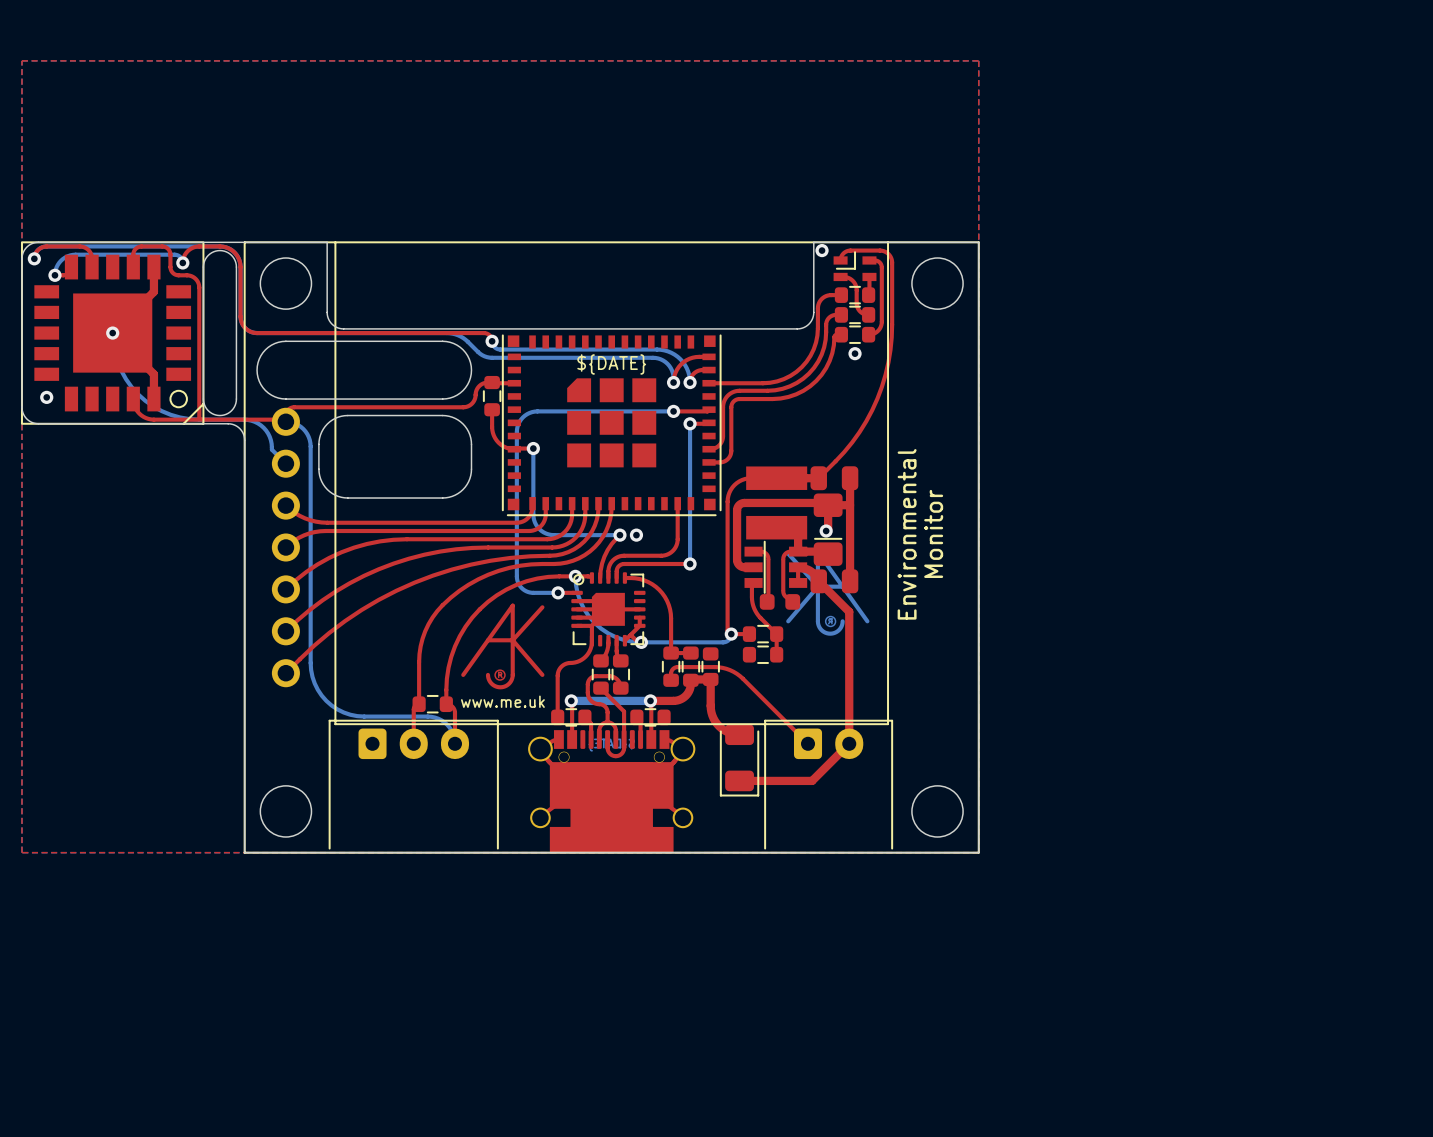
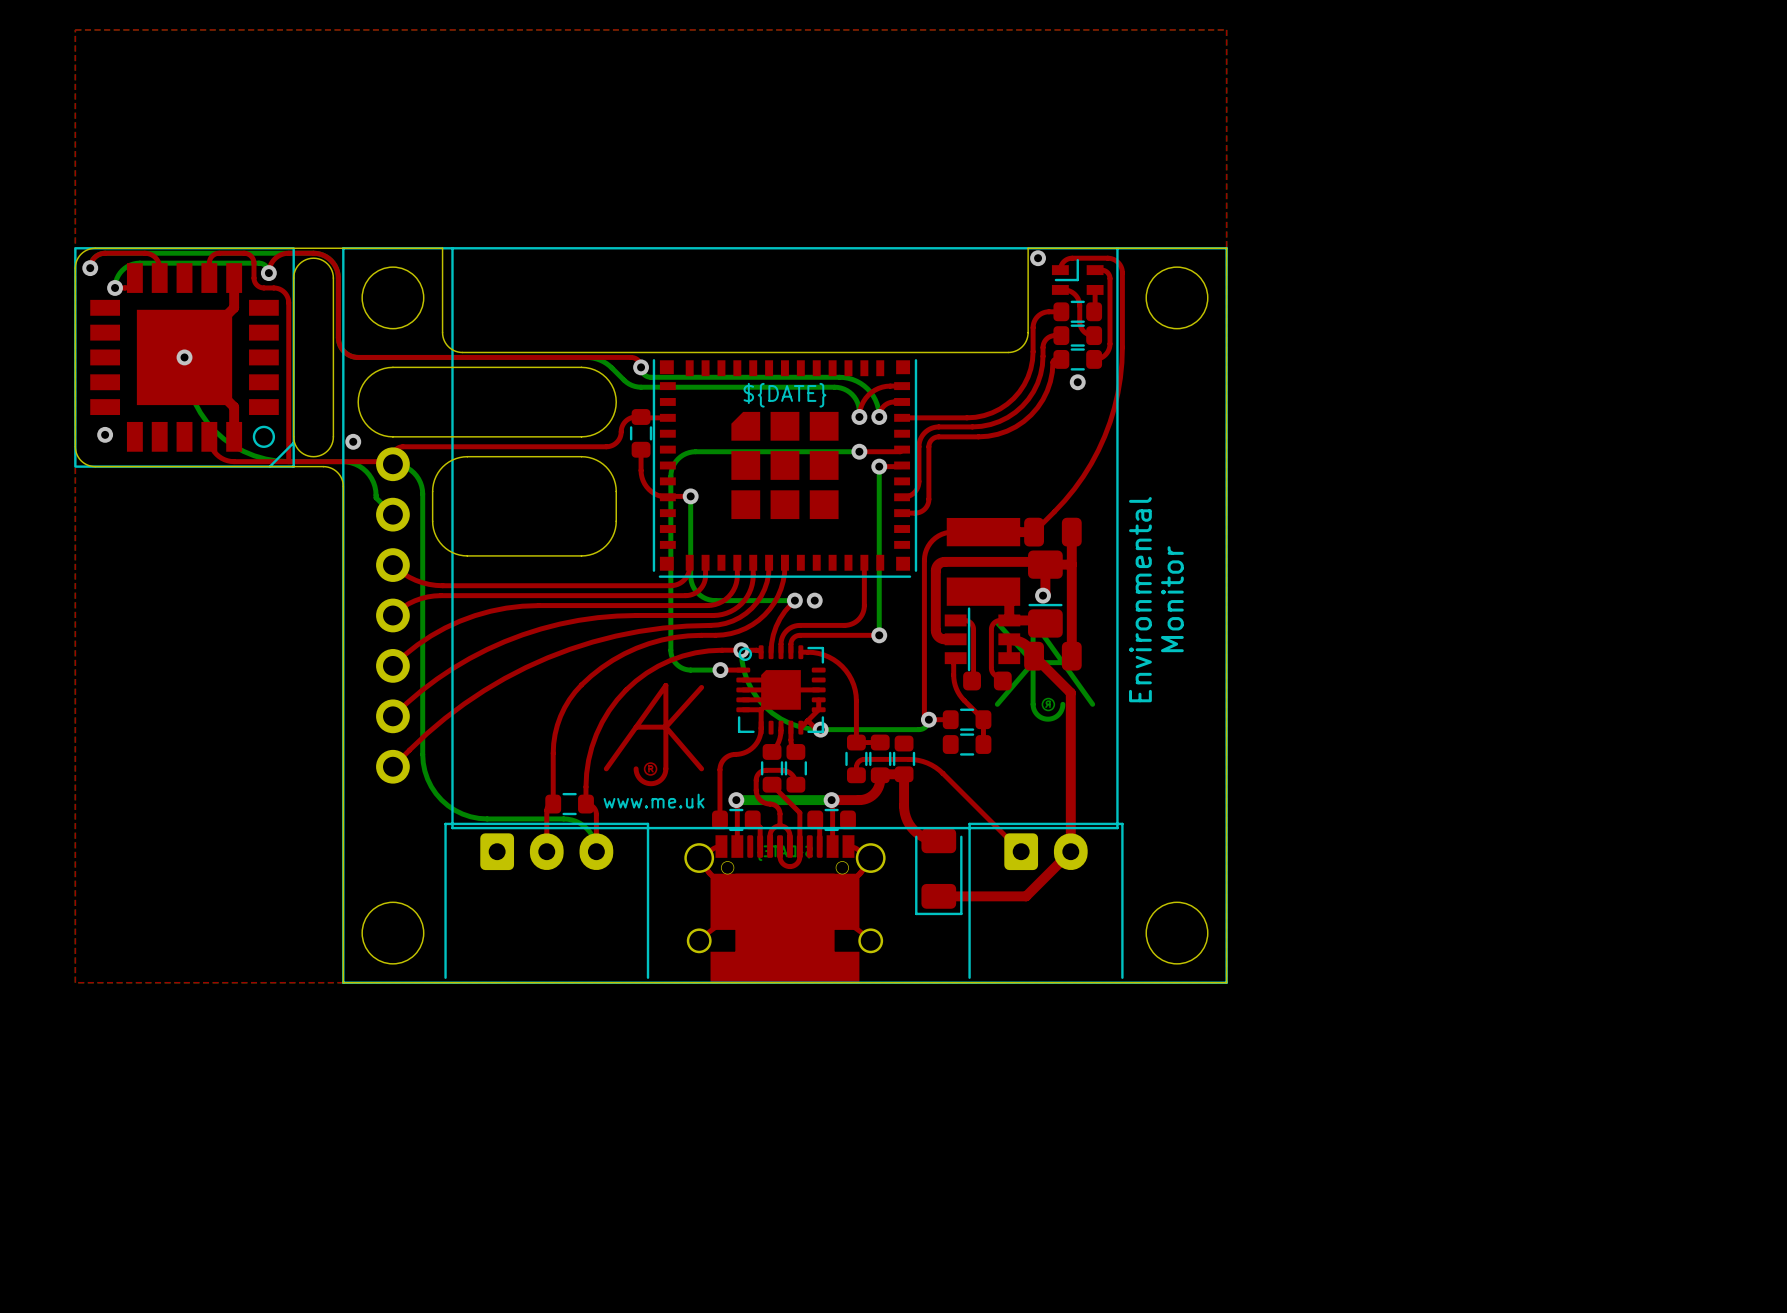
via: none -> (353, 441)

